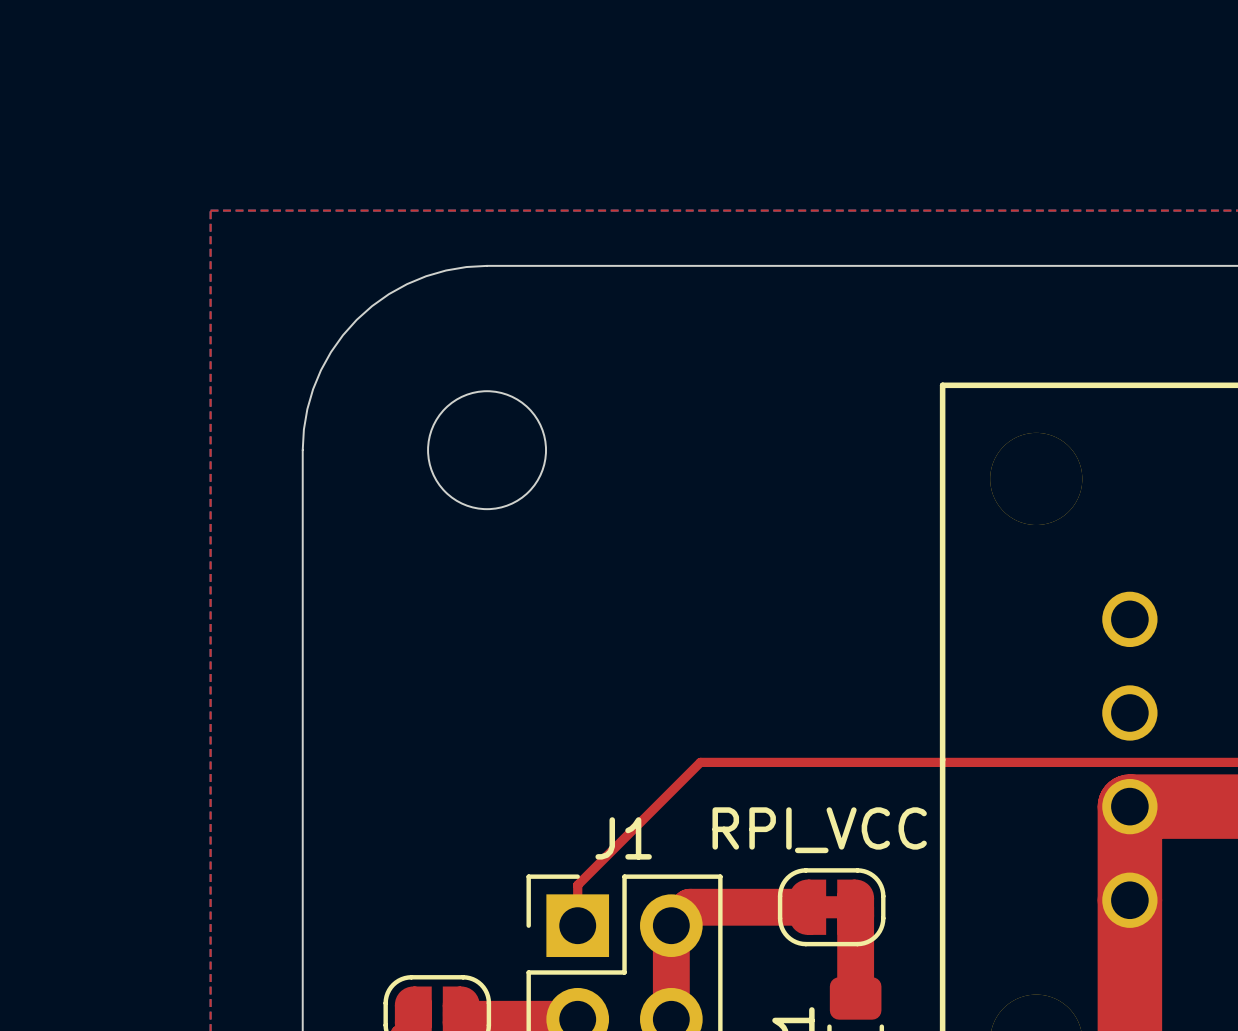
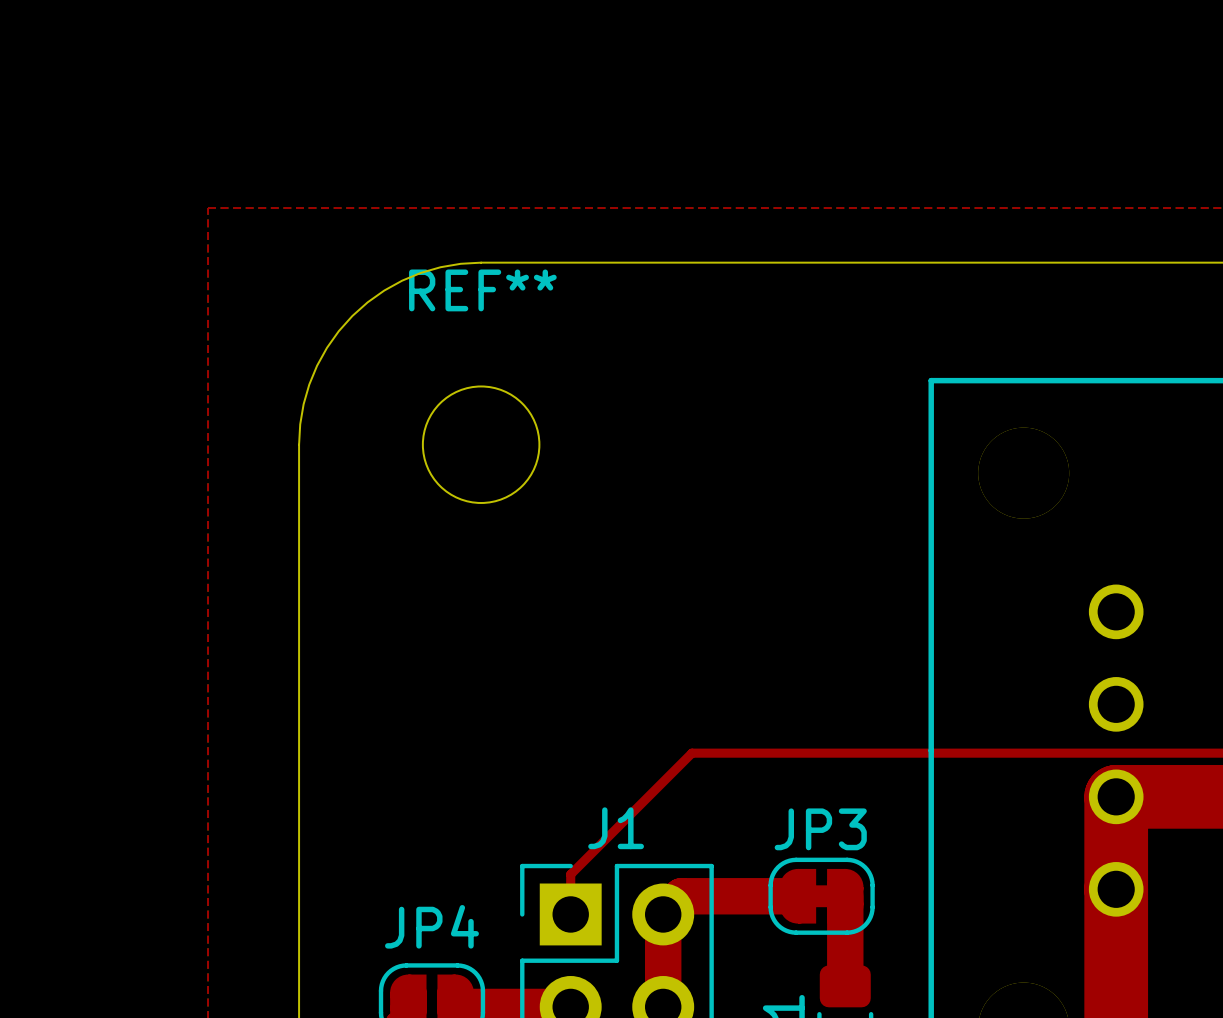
REF** name: none -> REF** (482, 290)
RPI_VCC name: RPI_VCC (819, 830) -> JP3 (820, 829)
JP4 name: none -> JP4 (431, 926)

